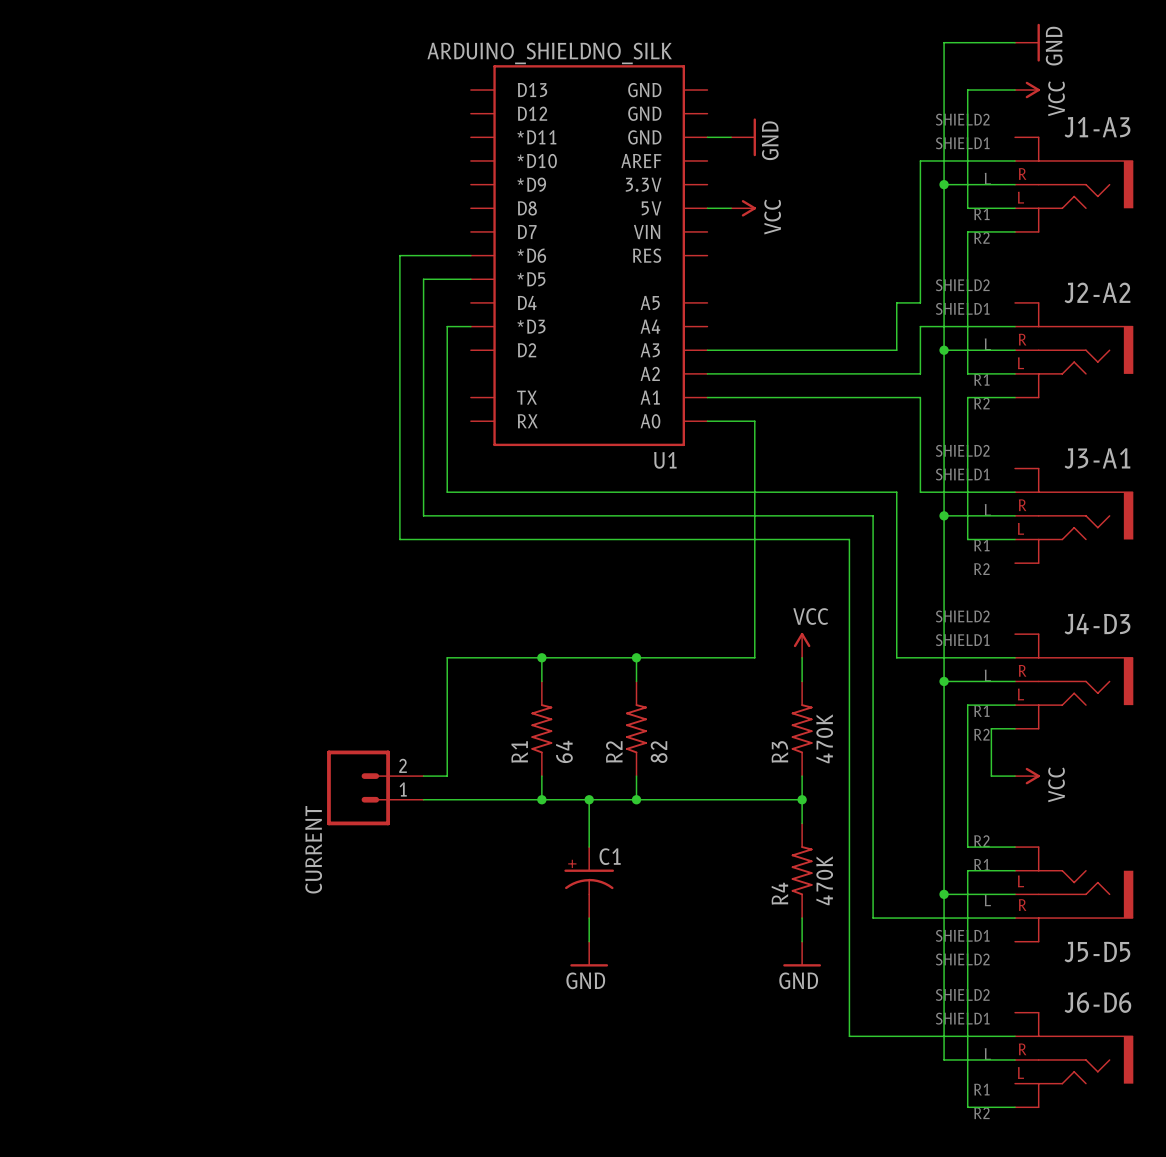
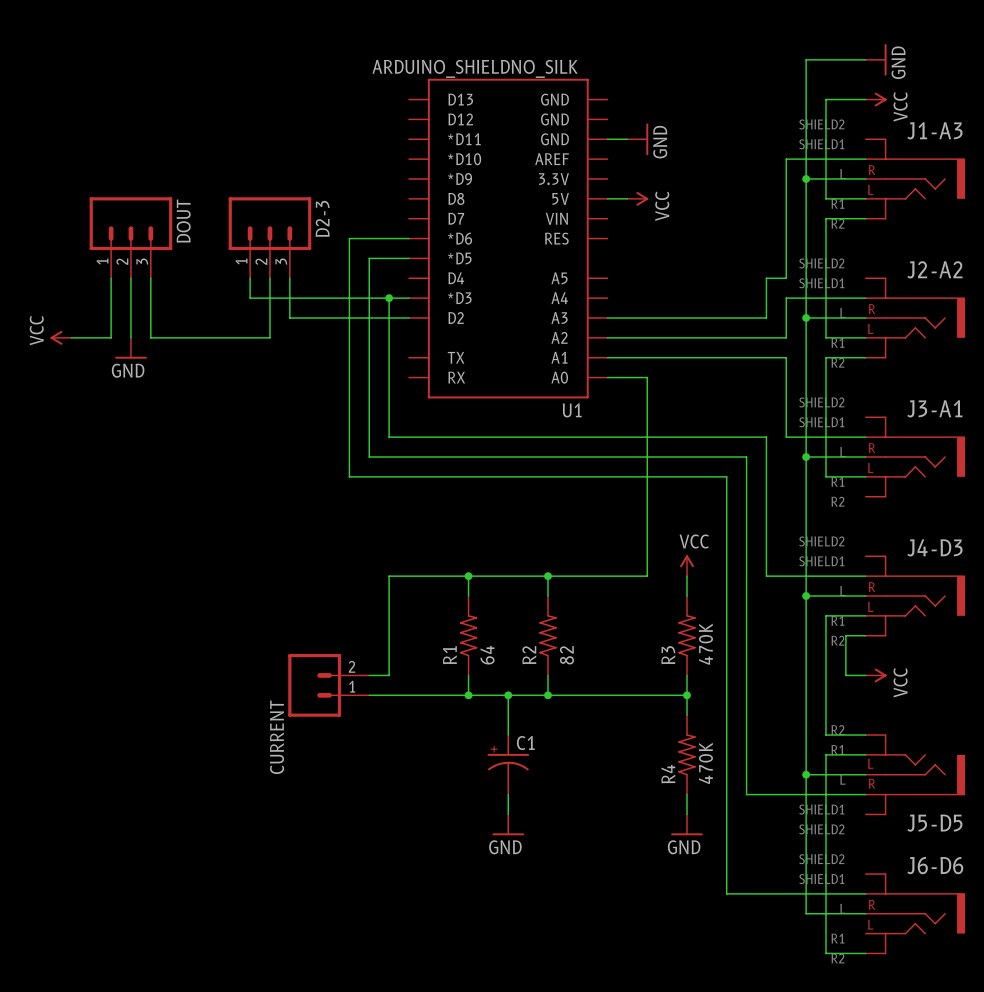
DOUT: none -> (130, 237)
D2-3: none -> (269, 237)
wire: none -> (111, 278) (111, 337) (71, 337)
wire: none -> (130, 278) (130, 337)
wire: none -> (150, 278) (150, 337) (269, 337) (269, 278)
wire: none -> (250, 278) (250, 298) (389, 298)
wire: none -> (289, 278) (289, 318) (408, 318)
junction: none -> (389, 298)
power symbol: none -> VCC (60, 337)
power symbol: none -> GND (130, 348)

